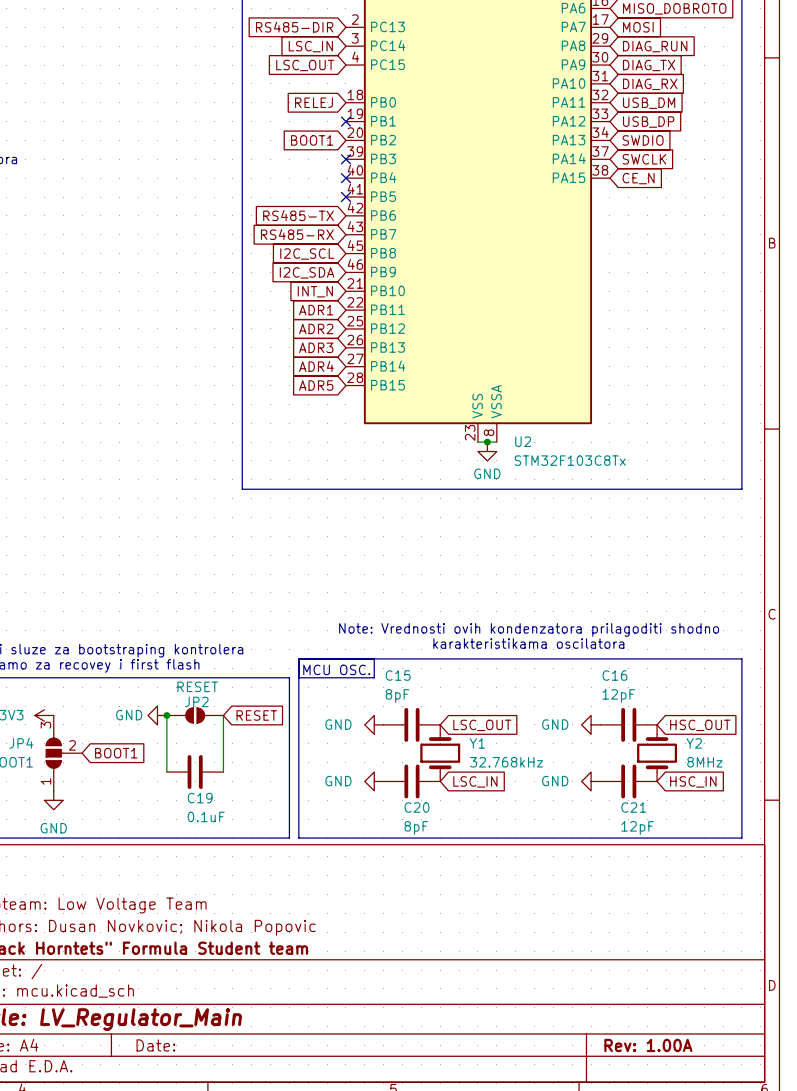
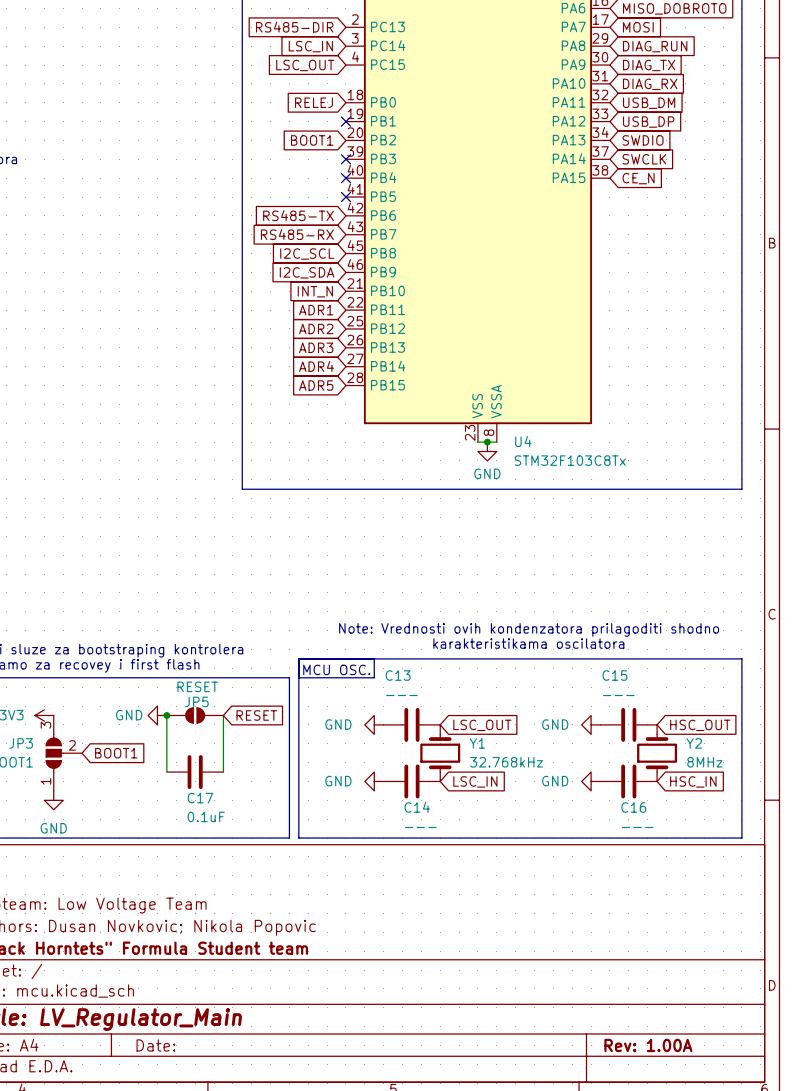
U2 name: U2 (523, 441) -> U4 (523, 441)
C15 name: C15 (398, 675) -> C13 (398, 675)
C16 name: C16 (614, 675) -> C15 (614, 675)
C15 value: 8pF (397, 695) -> --- (401, 695)
C16 value: 12pF (618, 695) -> --- (618, 695)
JP2 name: JP2 (196, 701) -> JP5 (196, 701)
JP4 name: JP4 (21, 743) -> JP3 (21, 743)
C19 name: C19 (200, 798) -> C17 (200, 798)
C20 name: C20 (416, 807) -> C14 (417, 807)
C21 name: C21 (633, 807) -> C16 (633, 807)
C20 value: 8pF (416, 827) -> --- (420, 827)
C21 value: 12pF (637, 827) -> --- (637, 827)

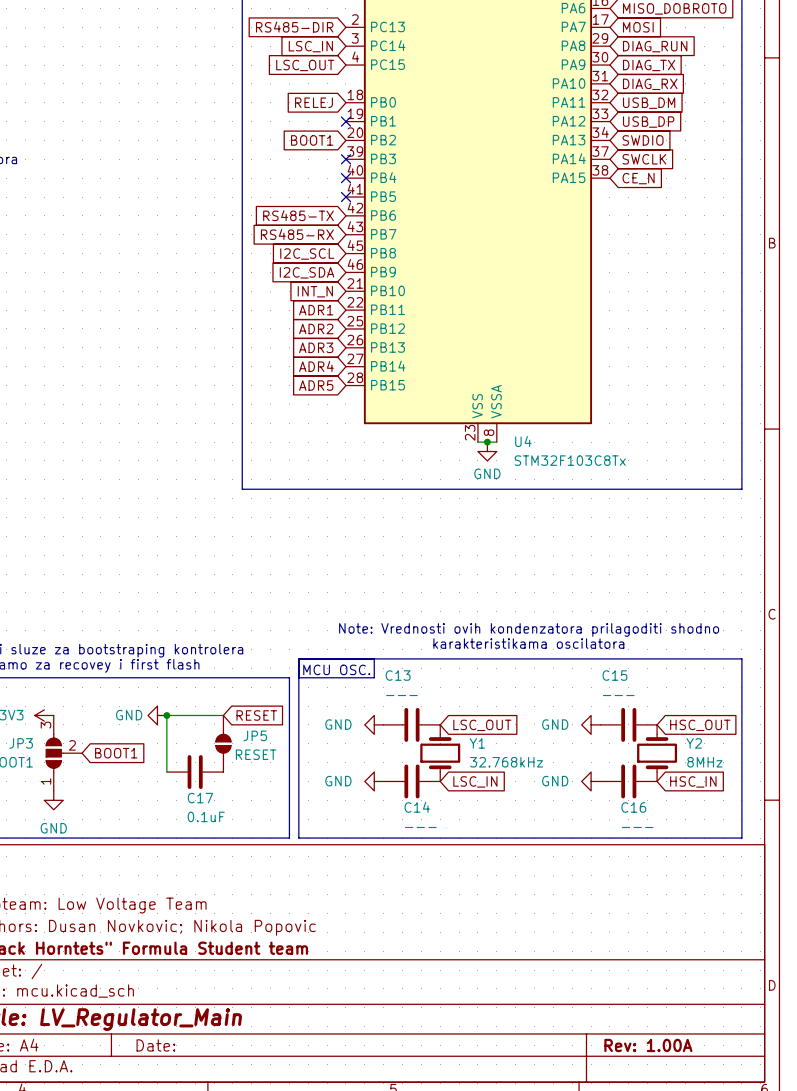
JP5 name position: JP5 (196, 701) -> JP5 (255, 735)
JP5 rotation: 0° (195, 715) -> 90° clockwise (223, 743)
JP5 position: (195, 715) -> (223, 743)

